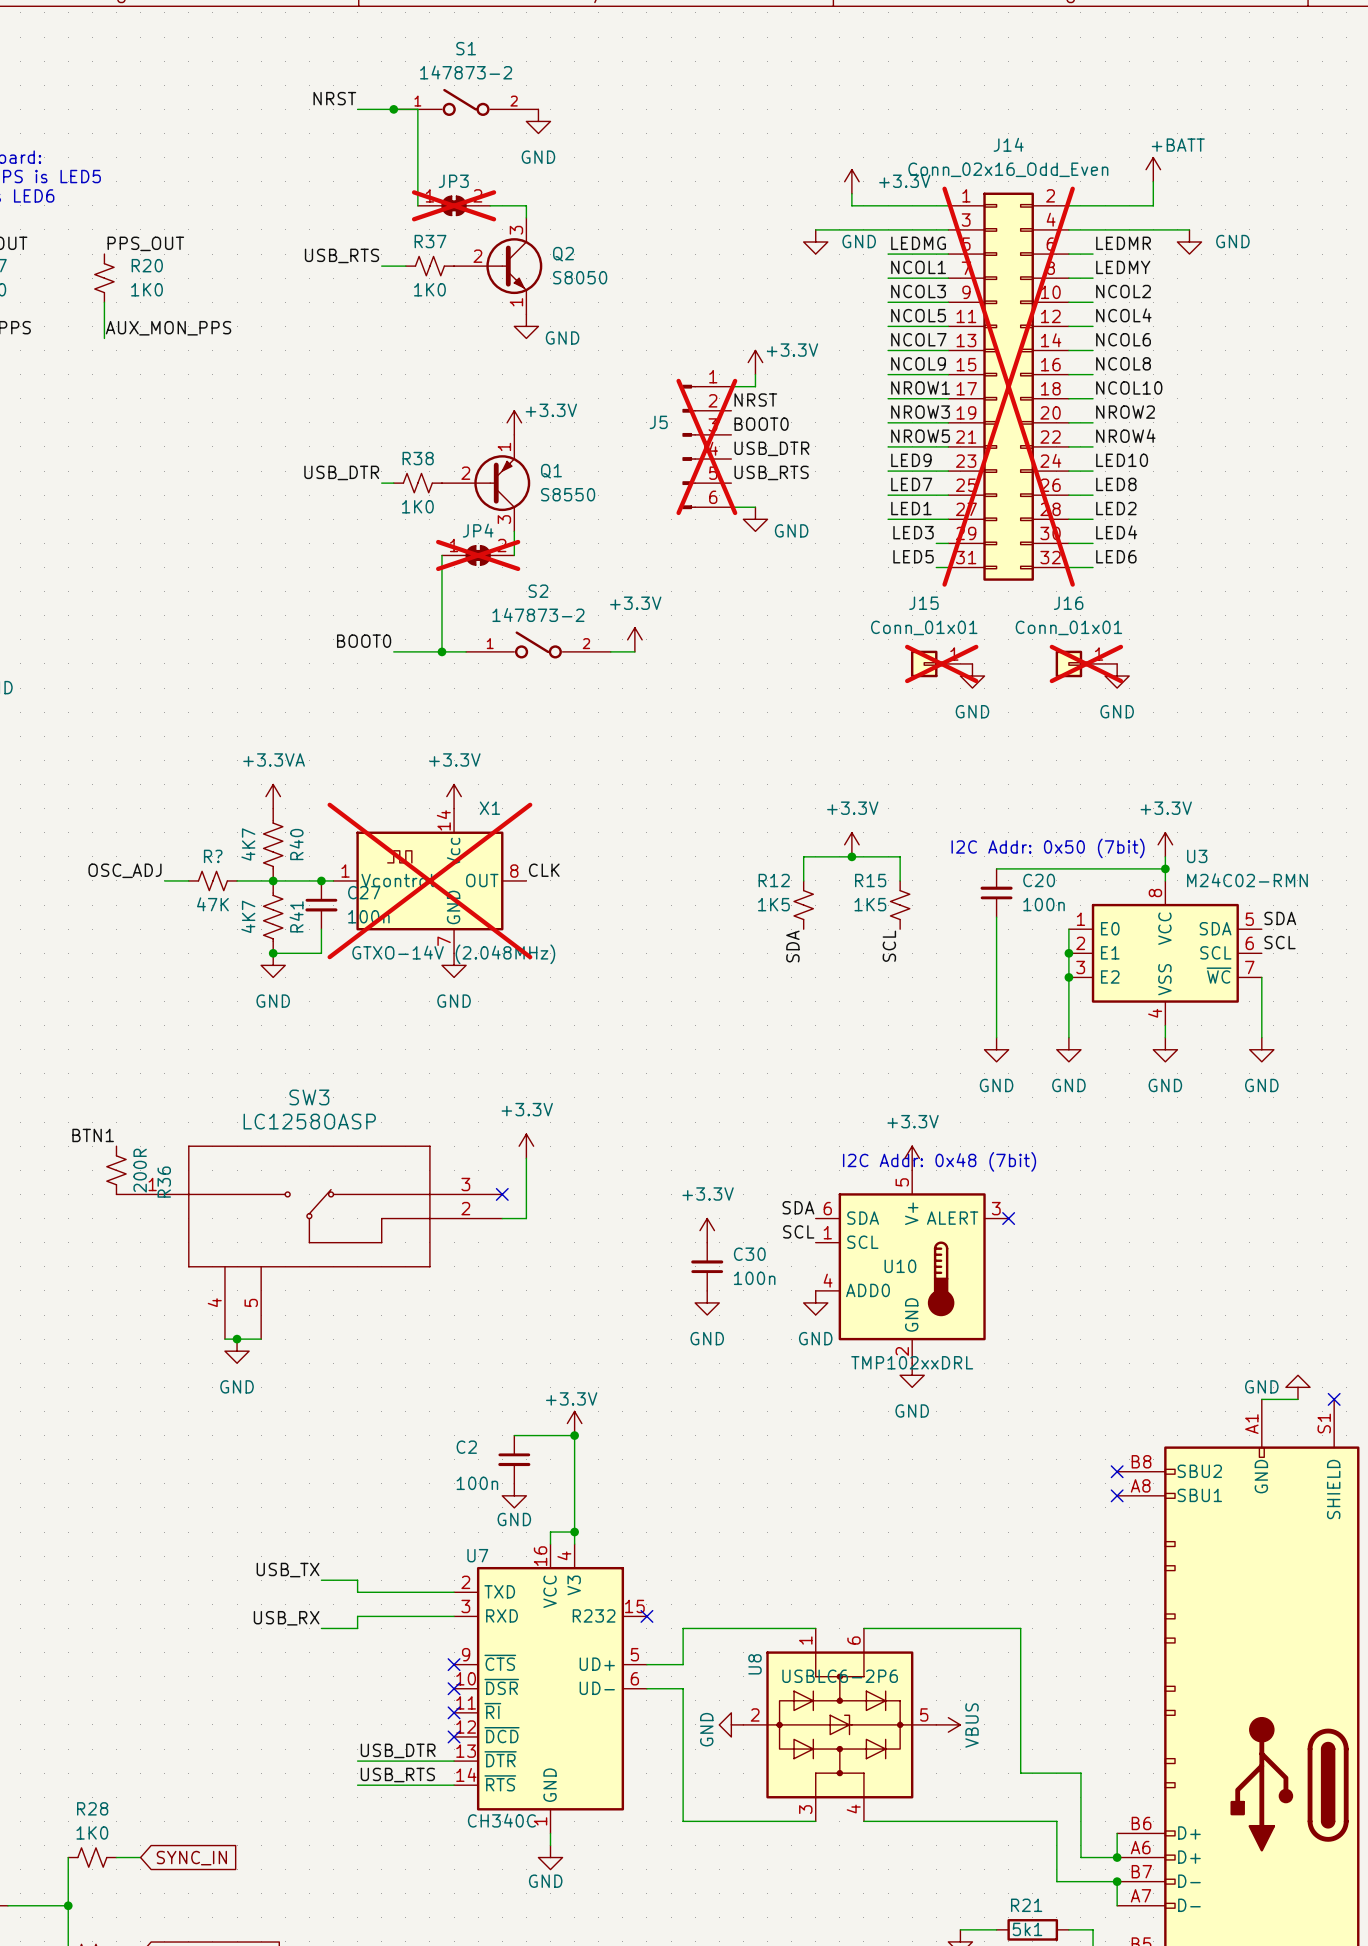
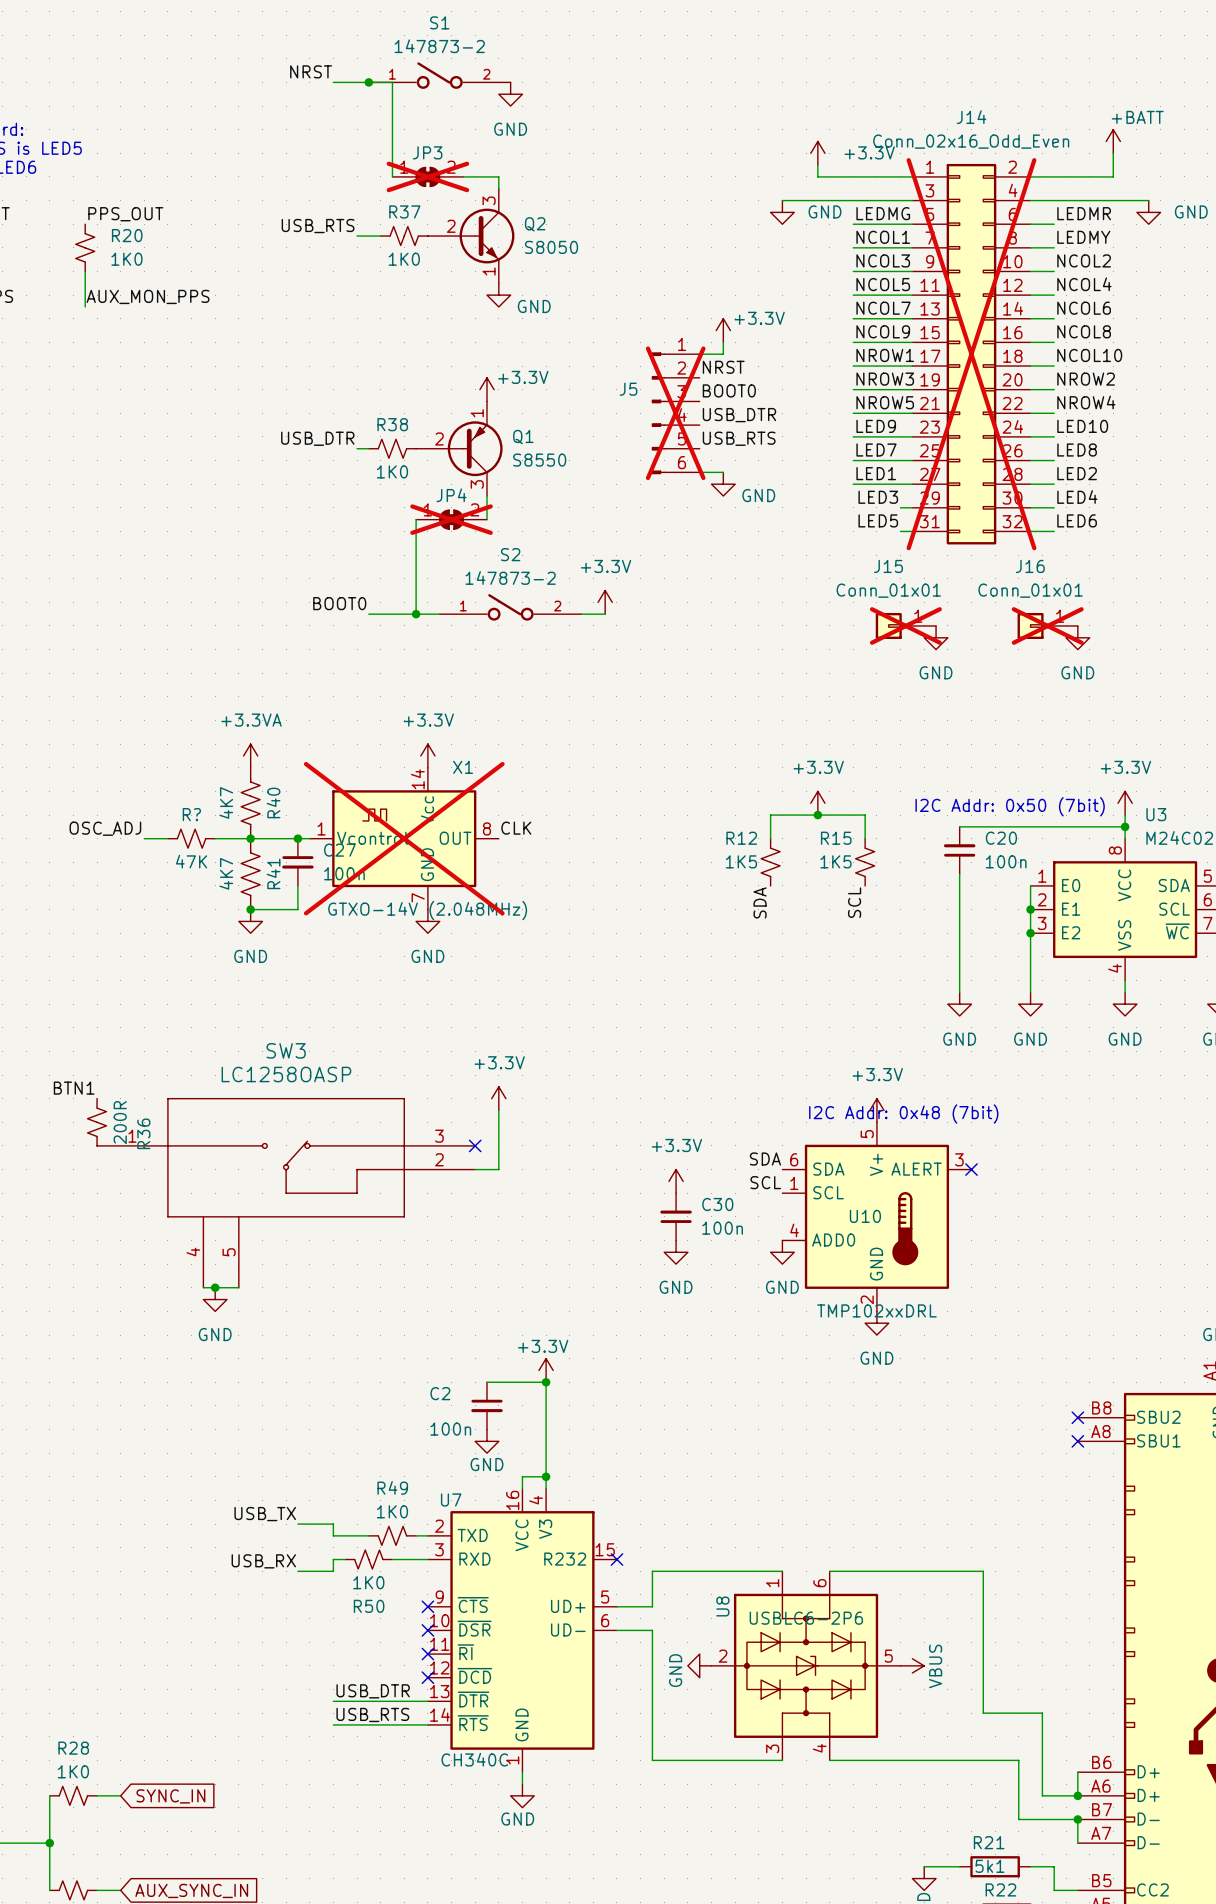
R49: none -> 1K0 (392, 1535)
R50: none -> 1K0 (368, 1559)

